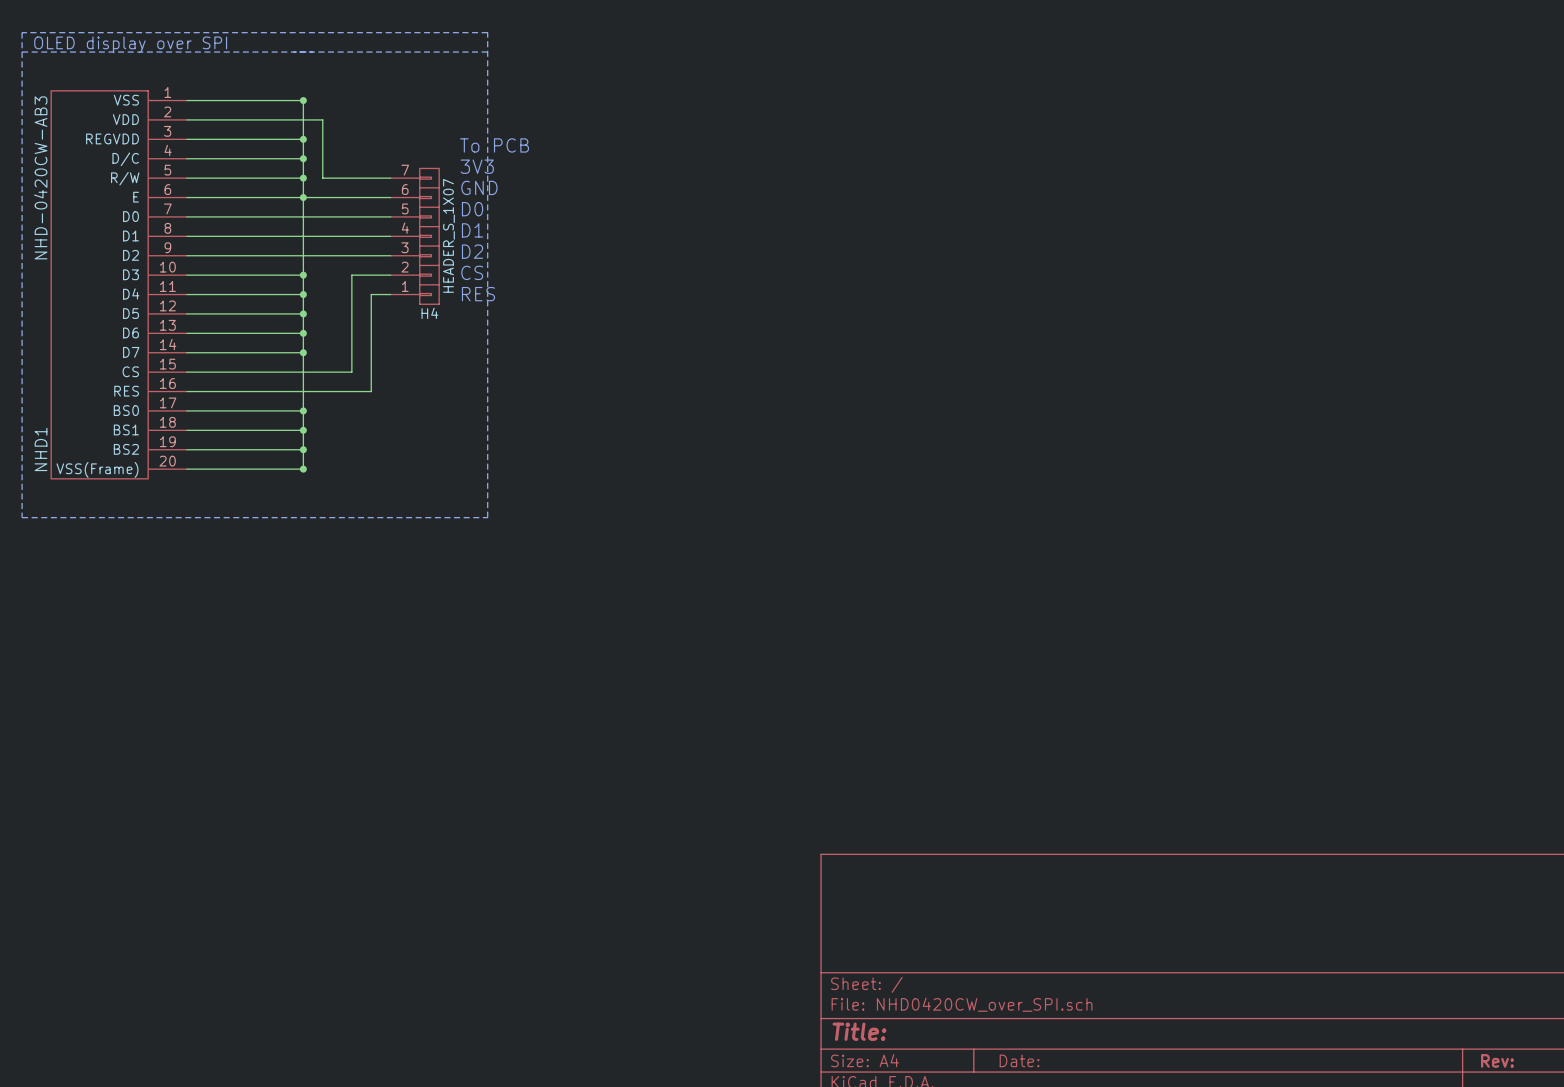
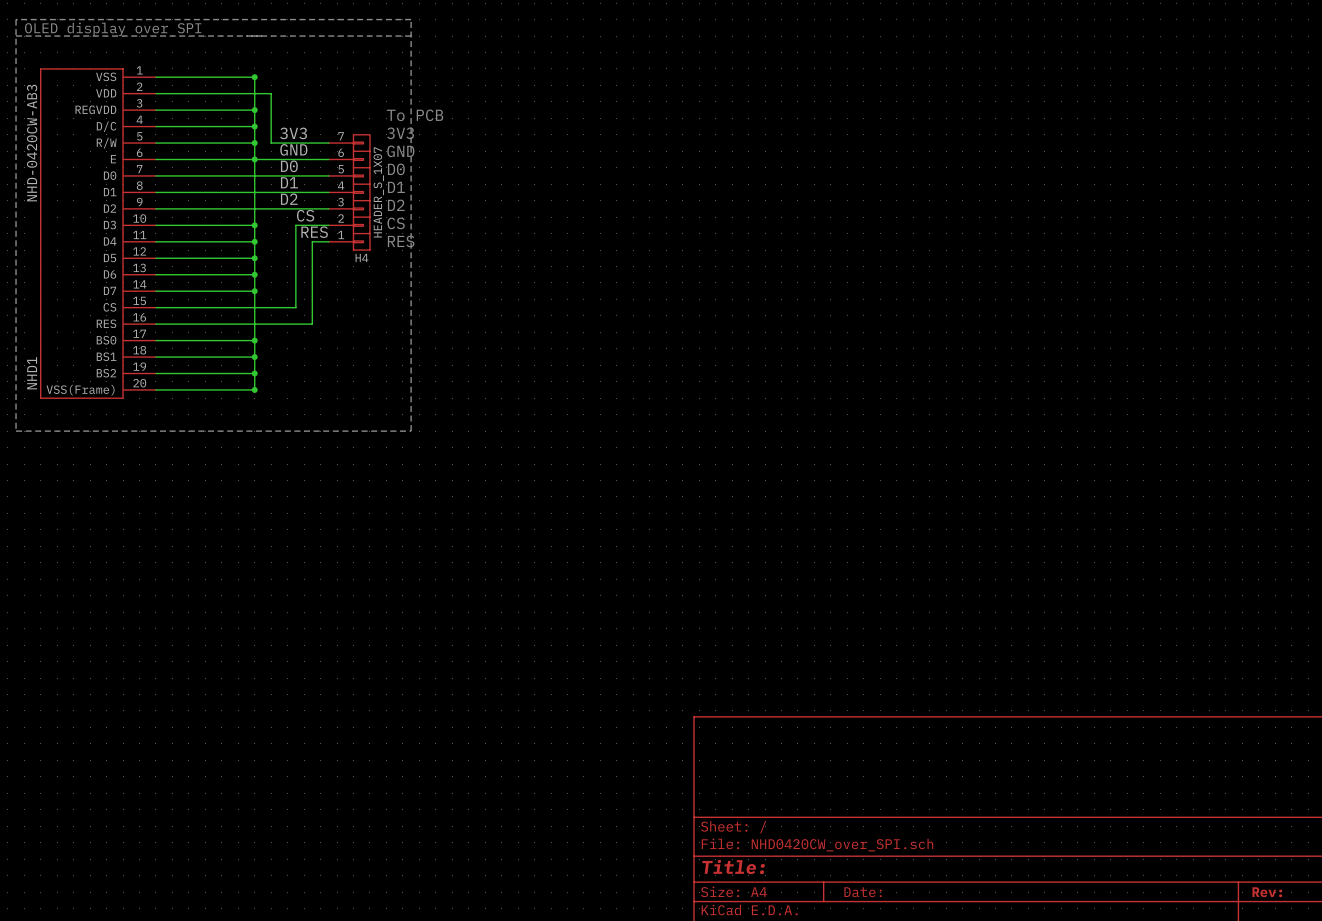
label: none -> 3V3 (293, 133)
label: none -> GND (293, 149)
label: none -> D0 (289, 166)
label: none -> D1 (289, 182)
label: none -> D2 (289, 199)
label: none -> CS (305, 215)
label: none -> RES (314, 232)

